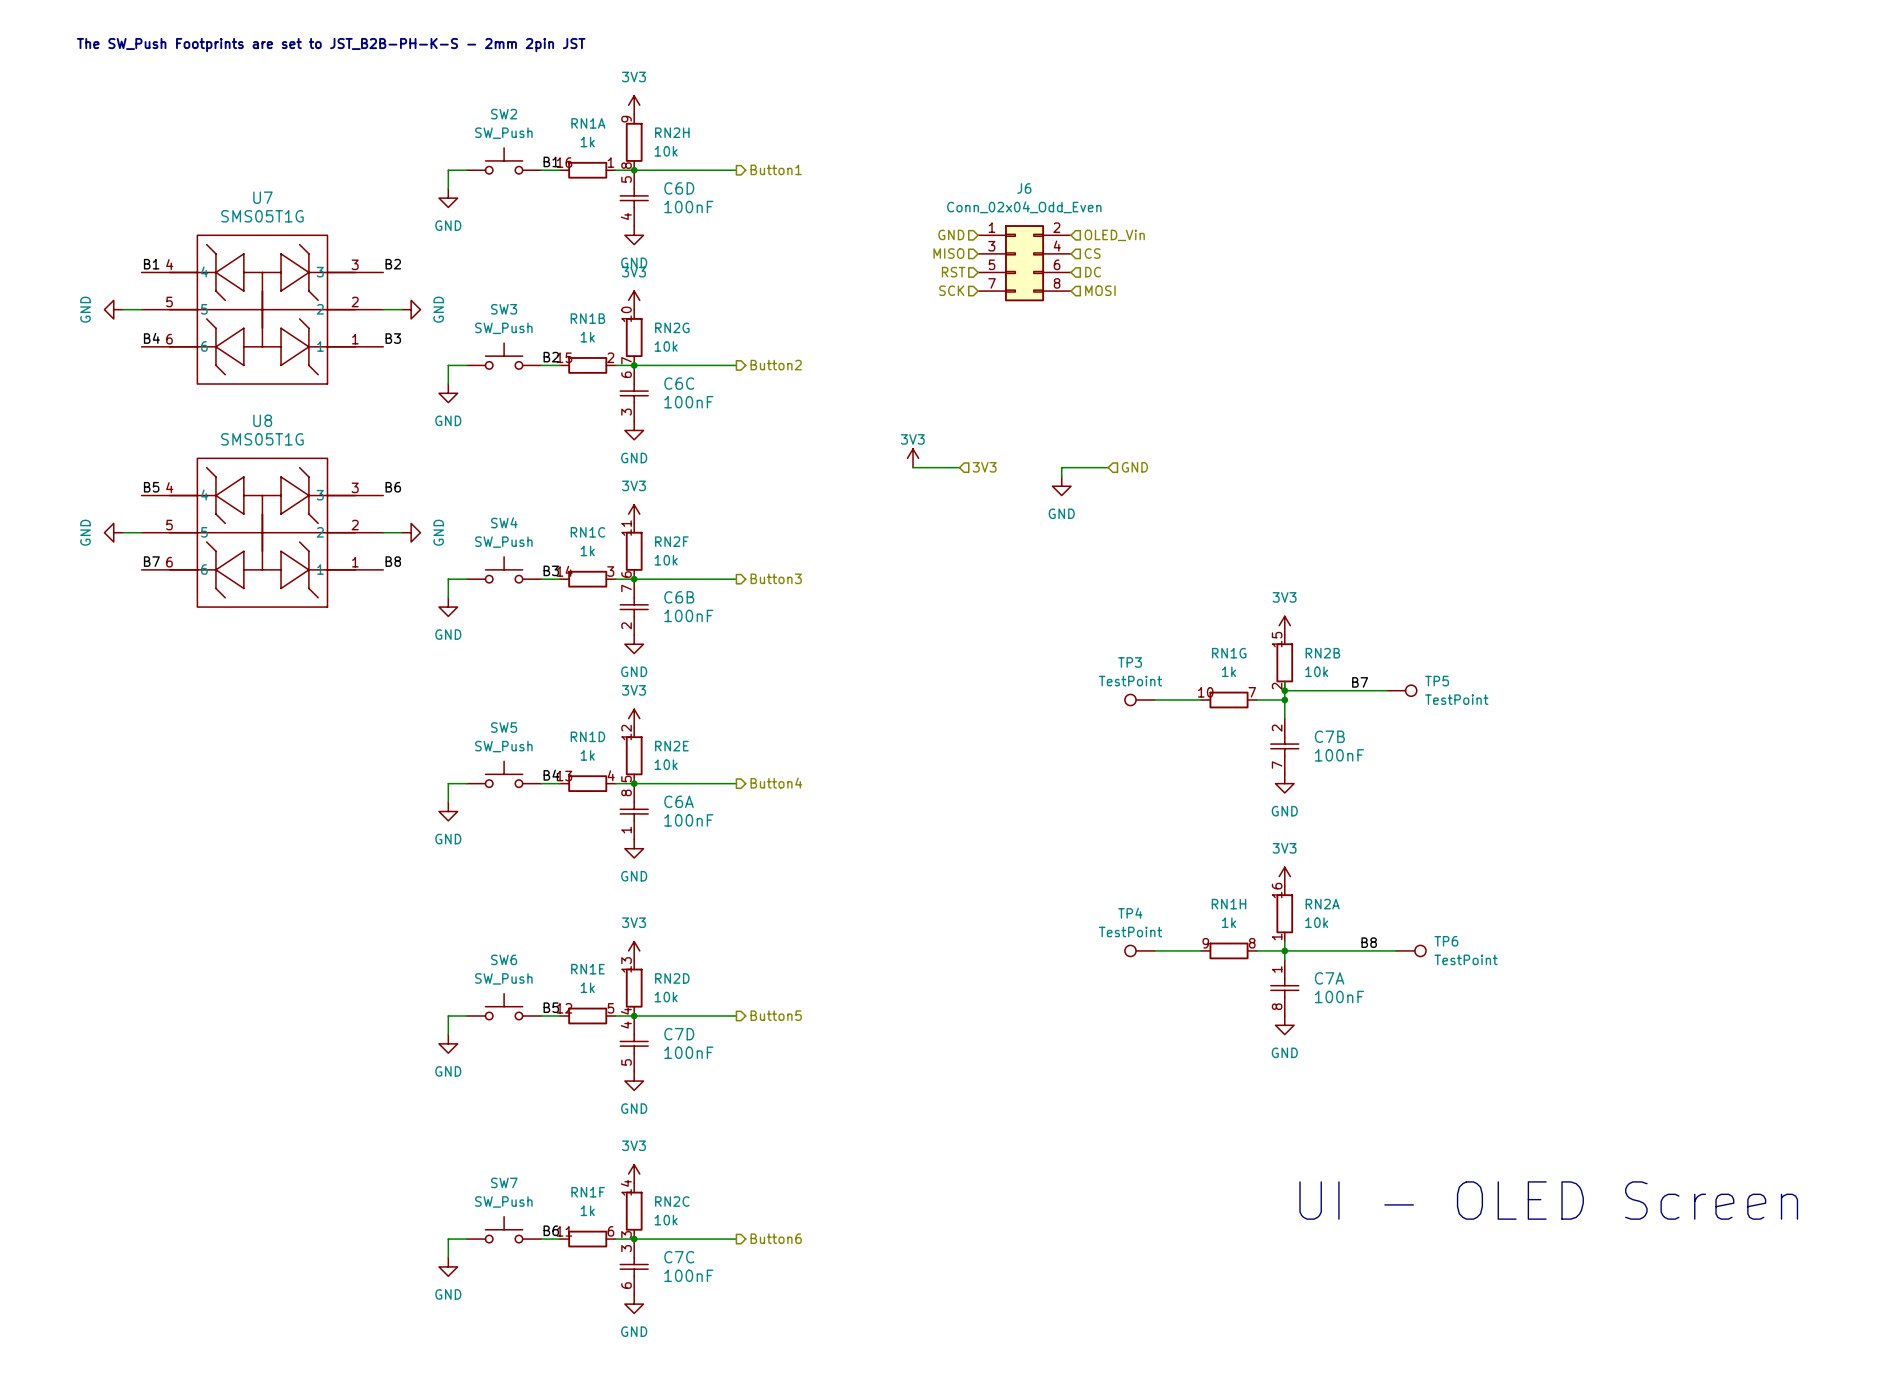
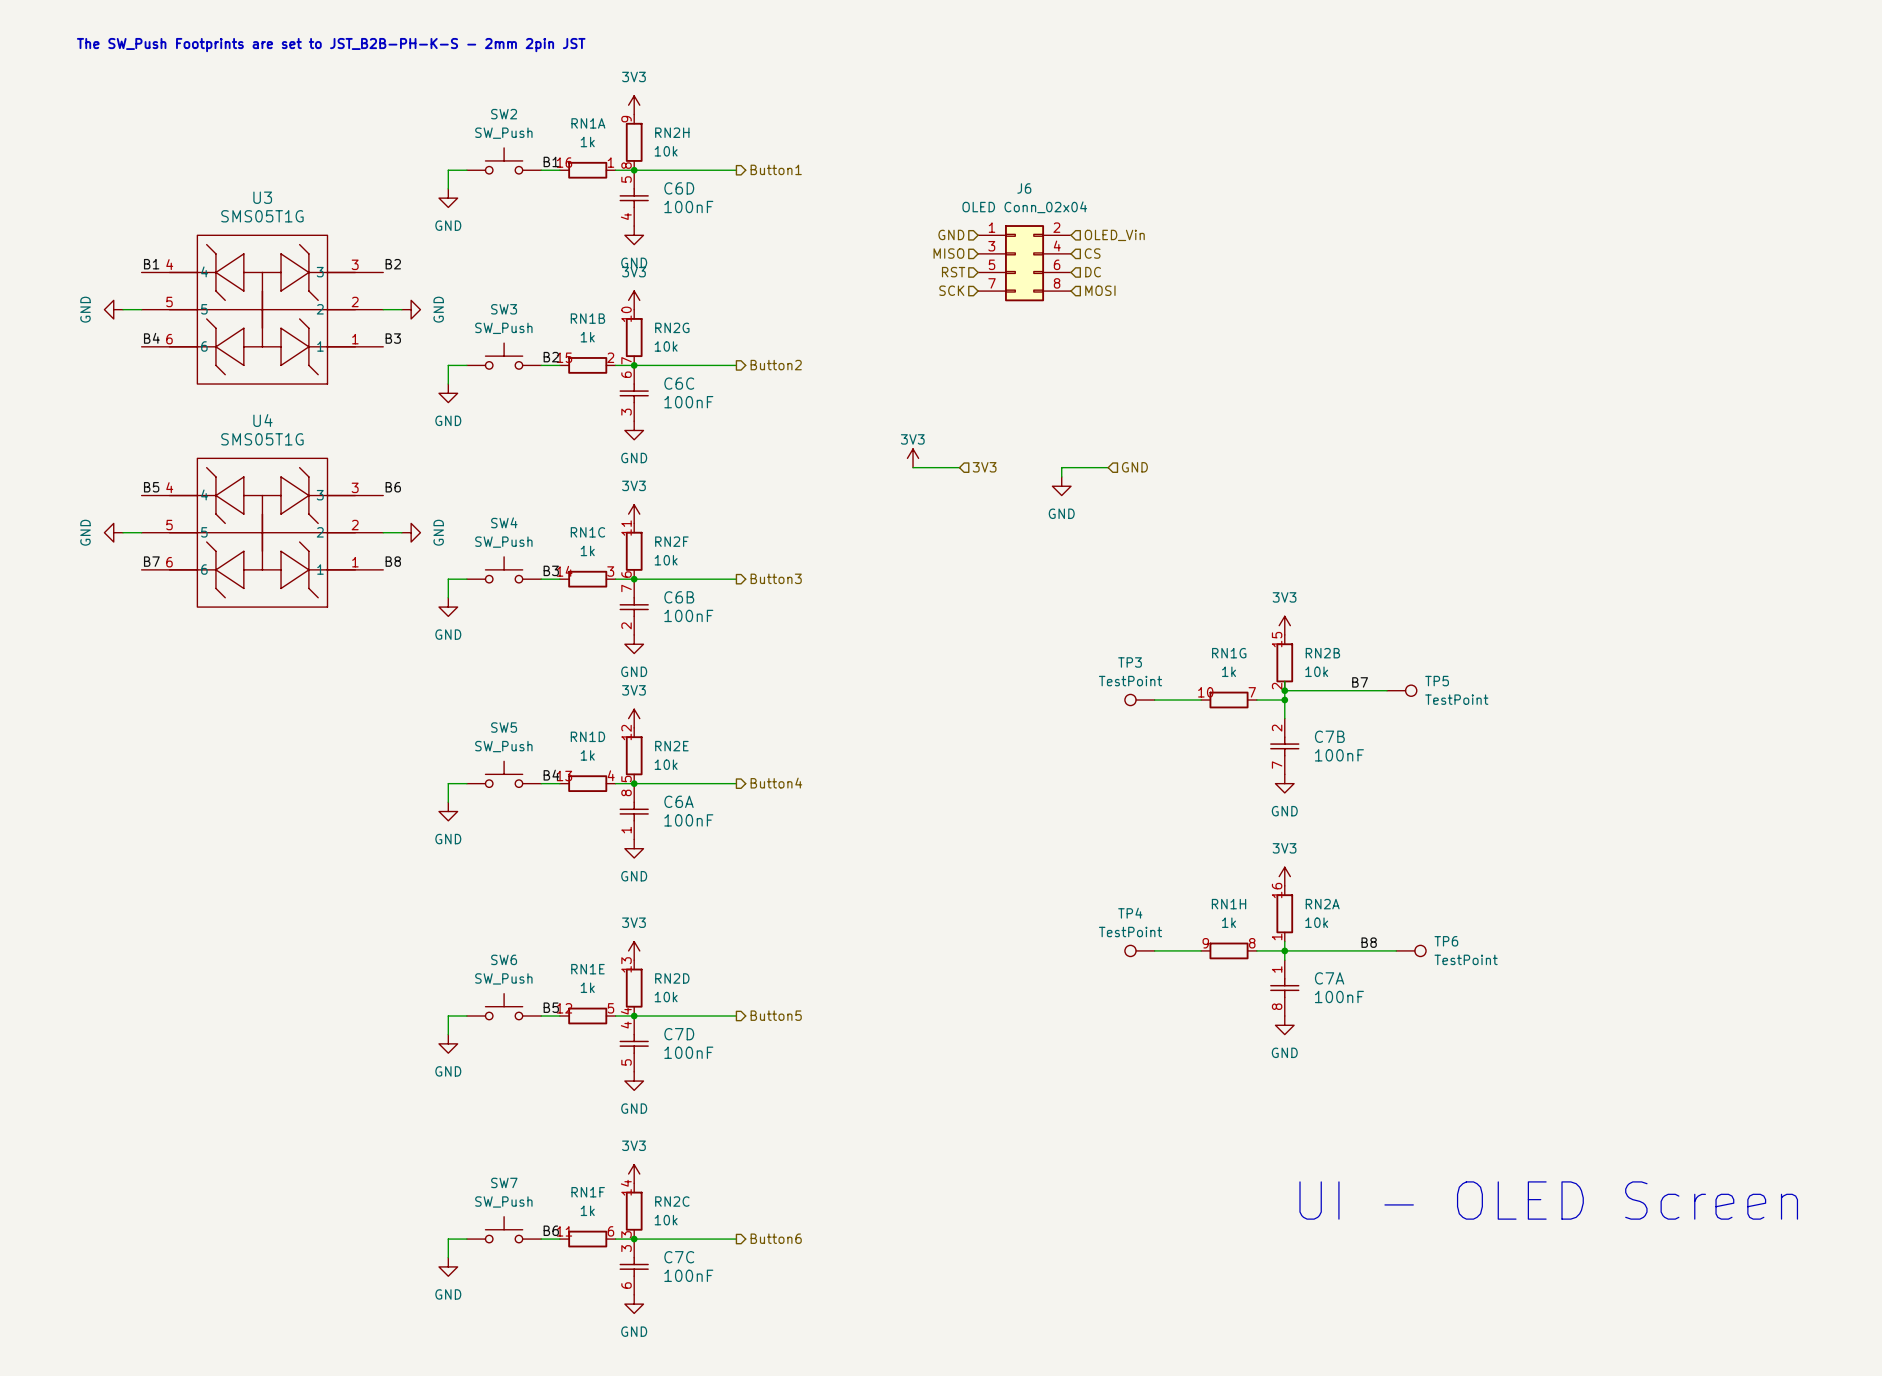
U7 name: U7 (262, 197) -> U3 (262, 197)
J6 value: Conn_02x04_Odd_Even (1024, 207) -> OLED Conn_02x04 (1024, 207)
U8 name: U8 (262, 420) -> U4 (262, 420)

